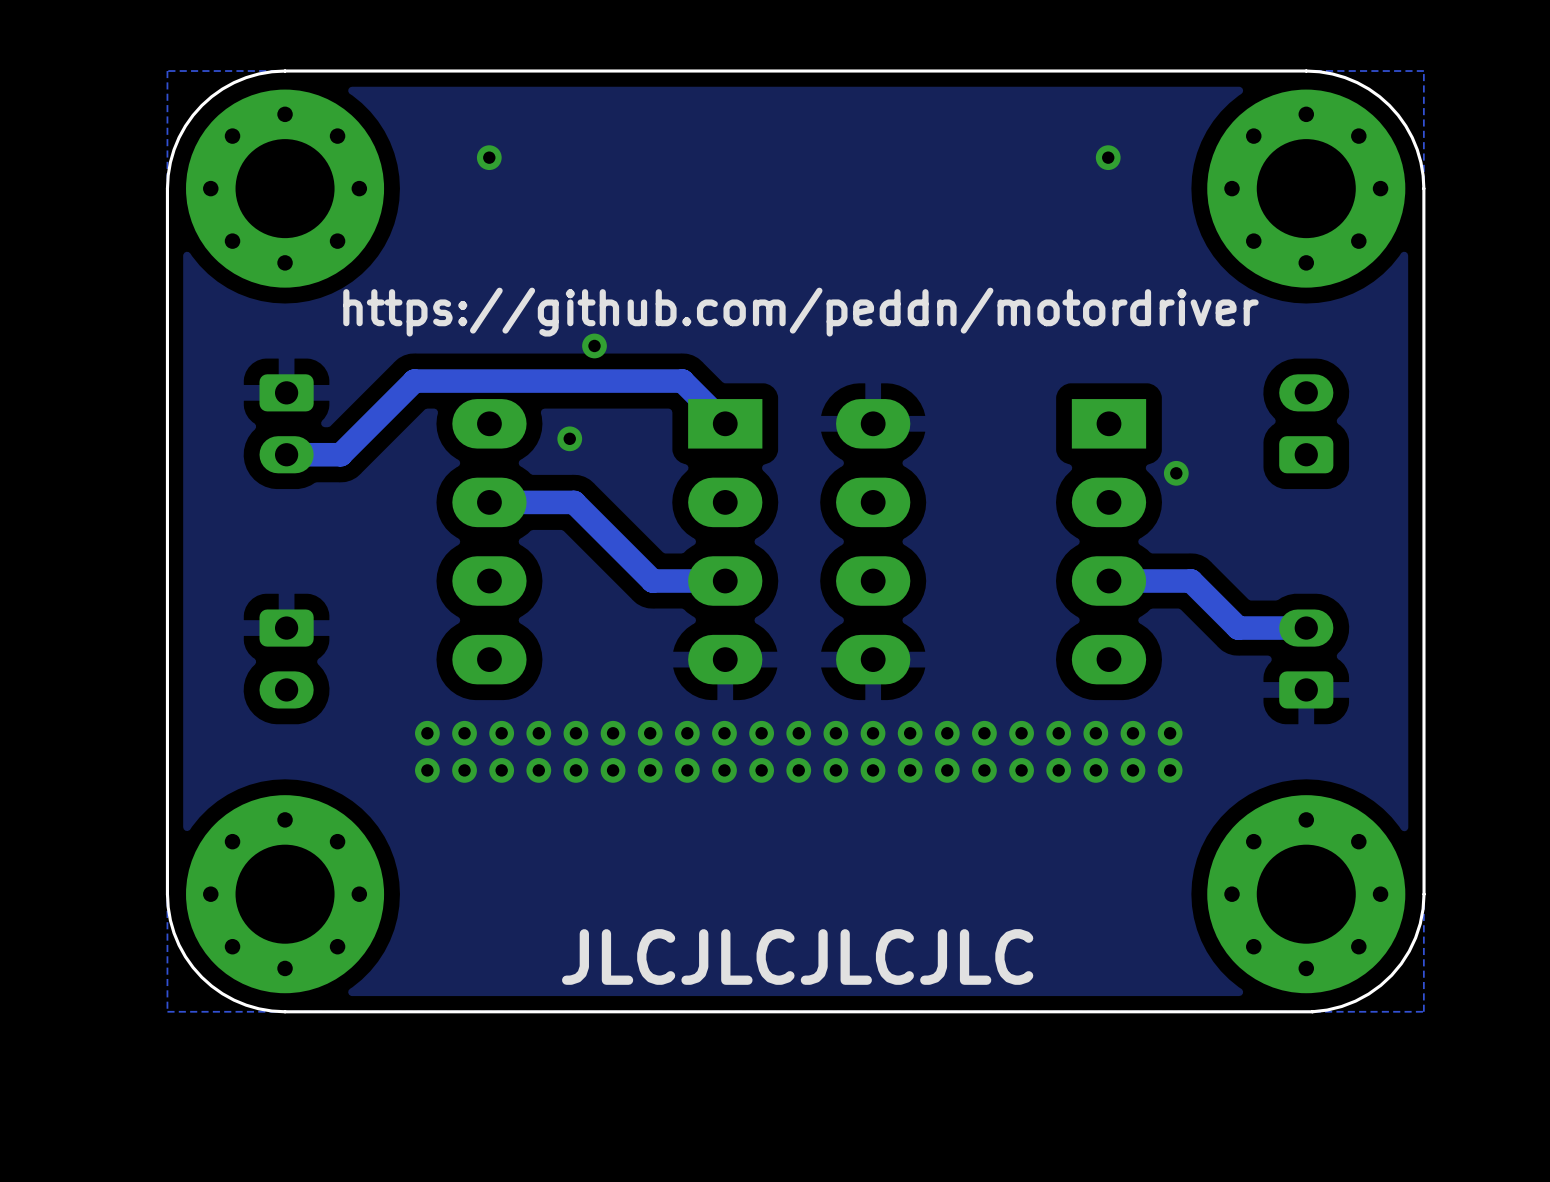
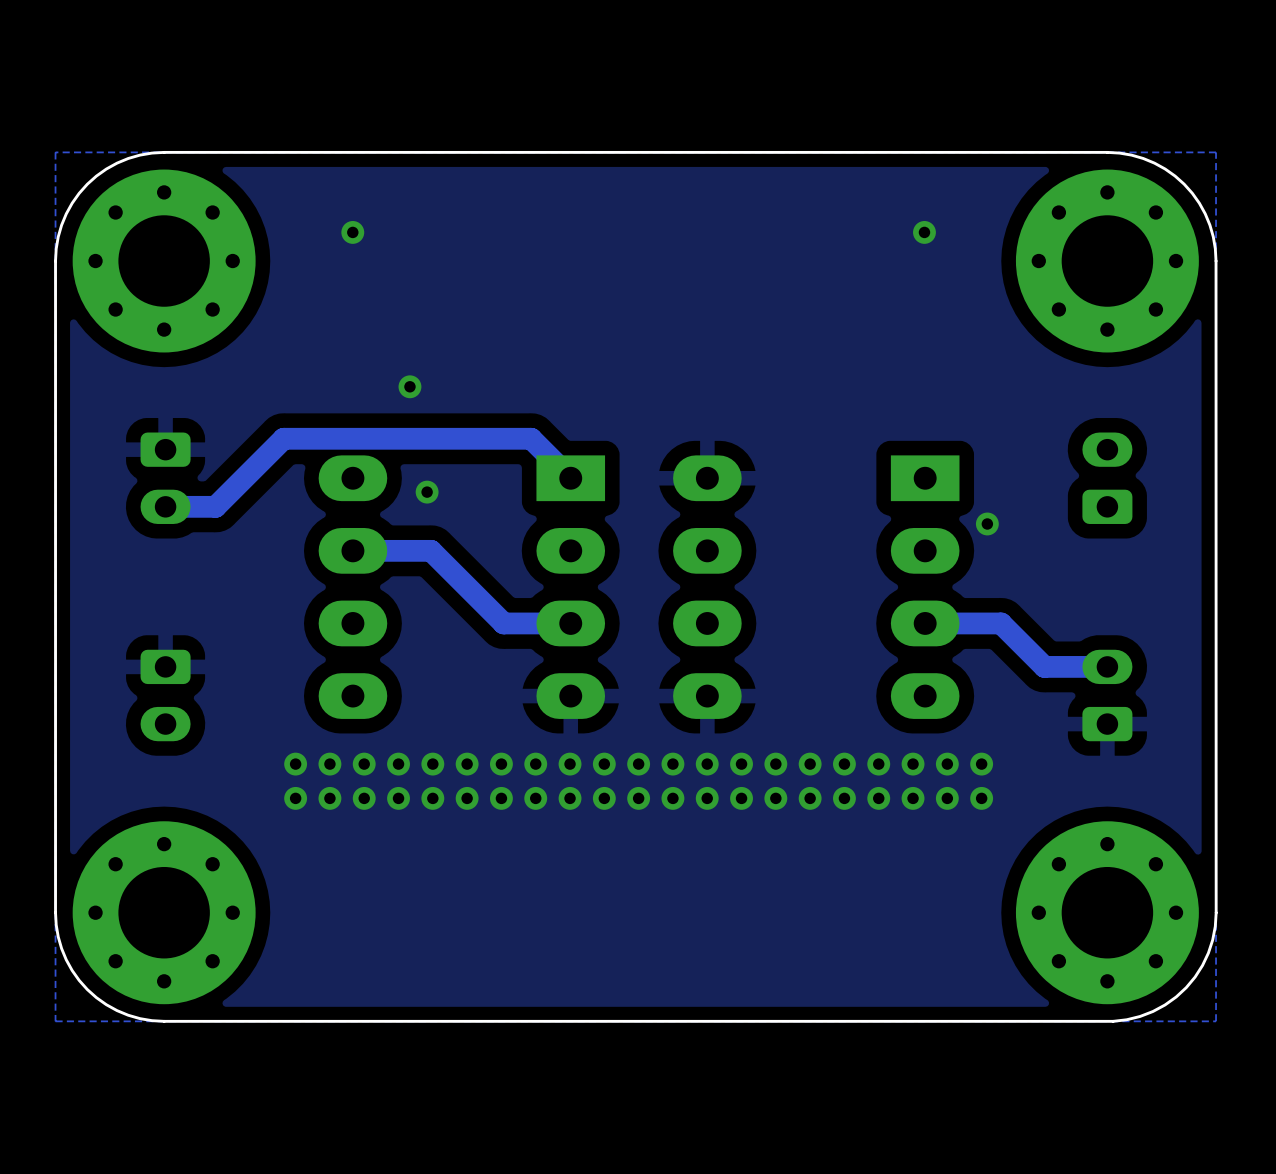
text: https://github.com/peddn/motordriver (800, 312) -> none
via position: (594, 345) -> (409, 386)
text: JLCJLCJLCJLC (797, 956) -> none

